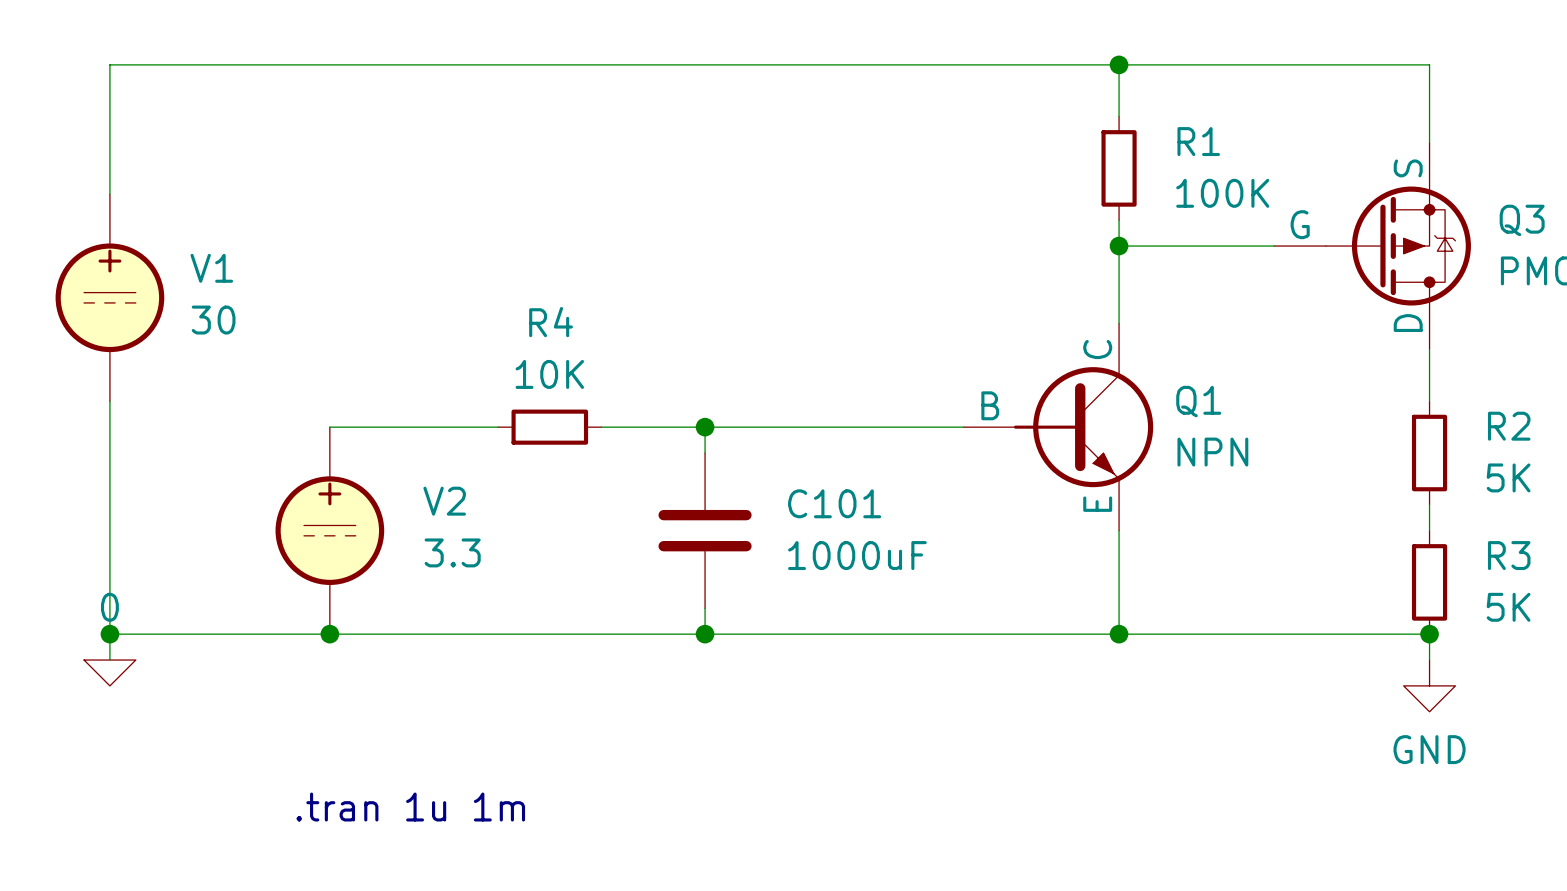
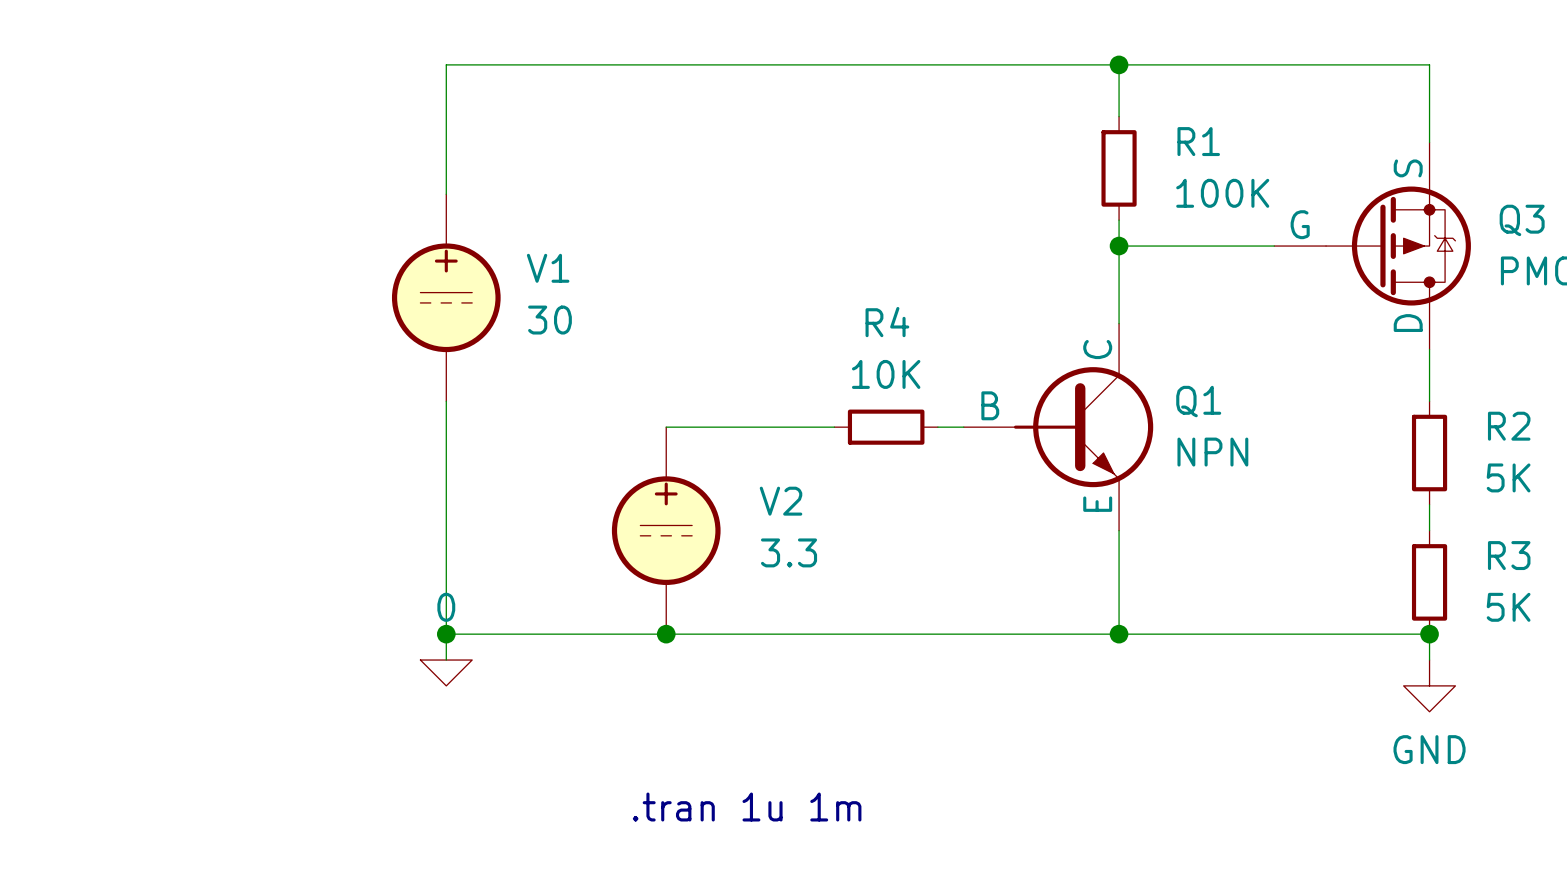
wire: (446, 64) (109, 64) (109, 194) -> (446, 64) (446, 194)
V1 position: (109, 297) -> (446, 297)
wire: (109, 401) (109, 660) -> (446, 401) (446, 660)
wire: (329, 427) (498, 427) -> none
R4 position: (549, 427) -> (886, 427)
wire: (601, 427) (666, 427) -> none
wire: (705, 427) (705, 453) -> none
junction: (705, 427) -> none
wire: (834, 427) (937, 427) -> none
V2 position: (329, 530) -> (666, 530)
C101: 1000uF (705, 530) -> none
wire: (705, 608) (705, 634) -> none
wire: (109, 634) (446, 634) -> none
junction: (109, 634) -> none
junction position: (329, 634) -> (446, 634)
junction position: (705, 634) -> (666, 634)
power symbol position: 0 (109, 672) -> 0 (446, 672)
text position: .tran 1u 1m (410, 807) -> .tran 1u 1m (747, 807)

